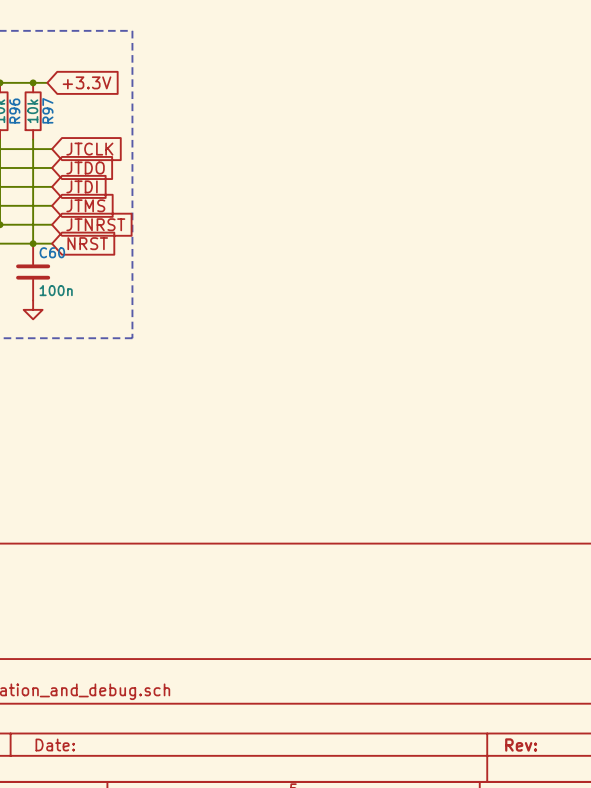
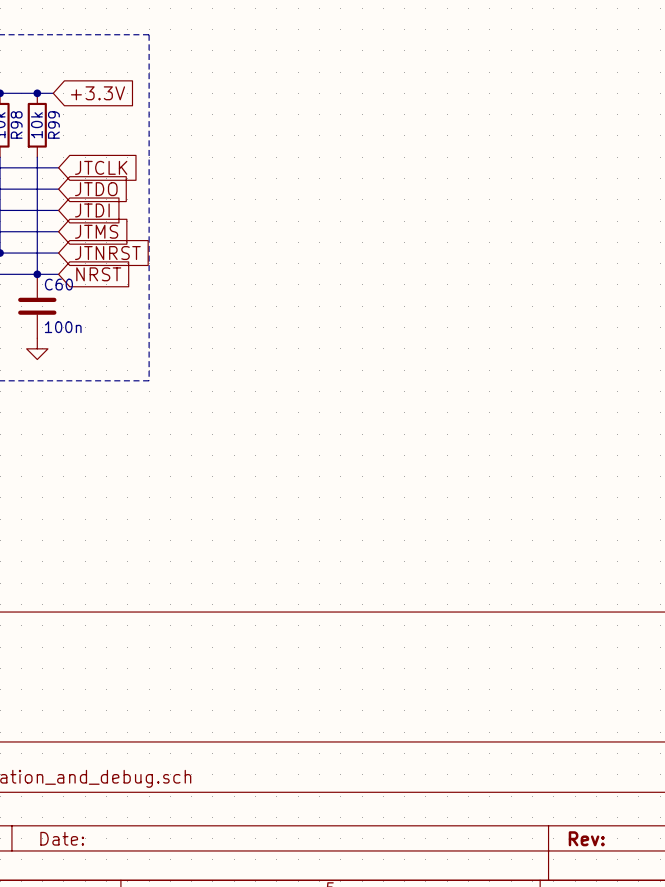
R97 name: R97 (47, 110) -> R99 (53, 125)
R96 name: R96 (14, 111) -> R98 (16, 125)

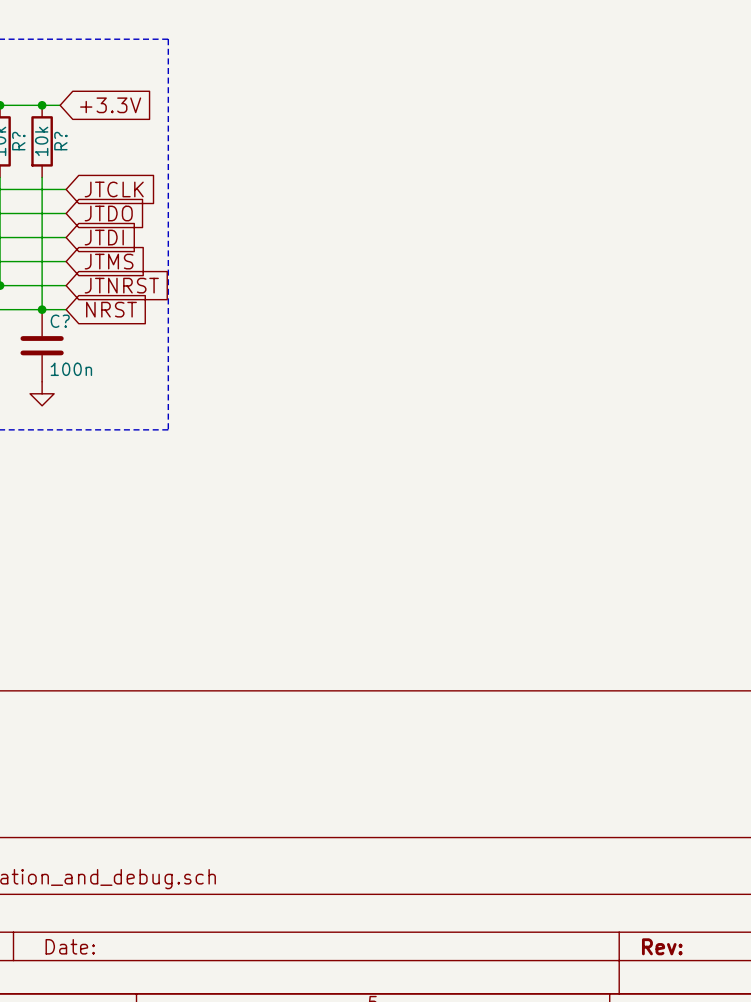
R98 name: R98 (16, 125) -> R? (18, 141)
R99 name: R99 (53, 125) -> R? (60, 141)
C60 name: C60 (58, 284) -> C? (60, 321)

